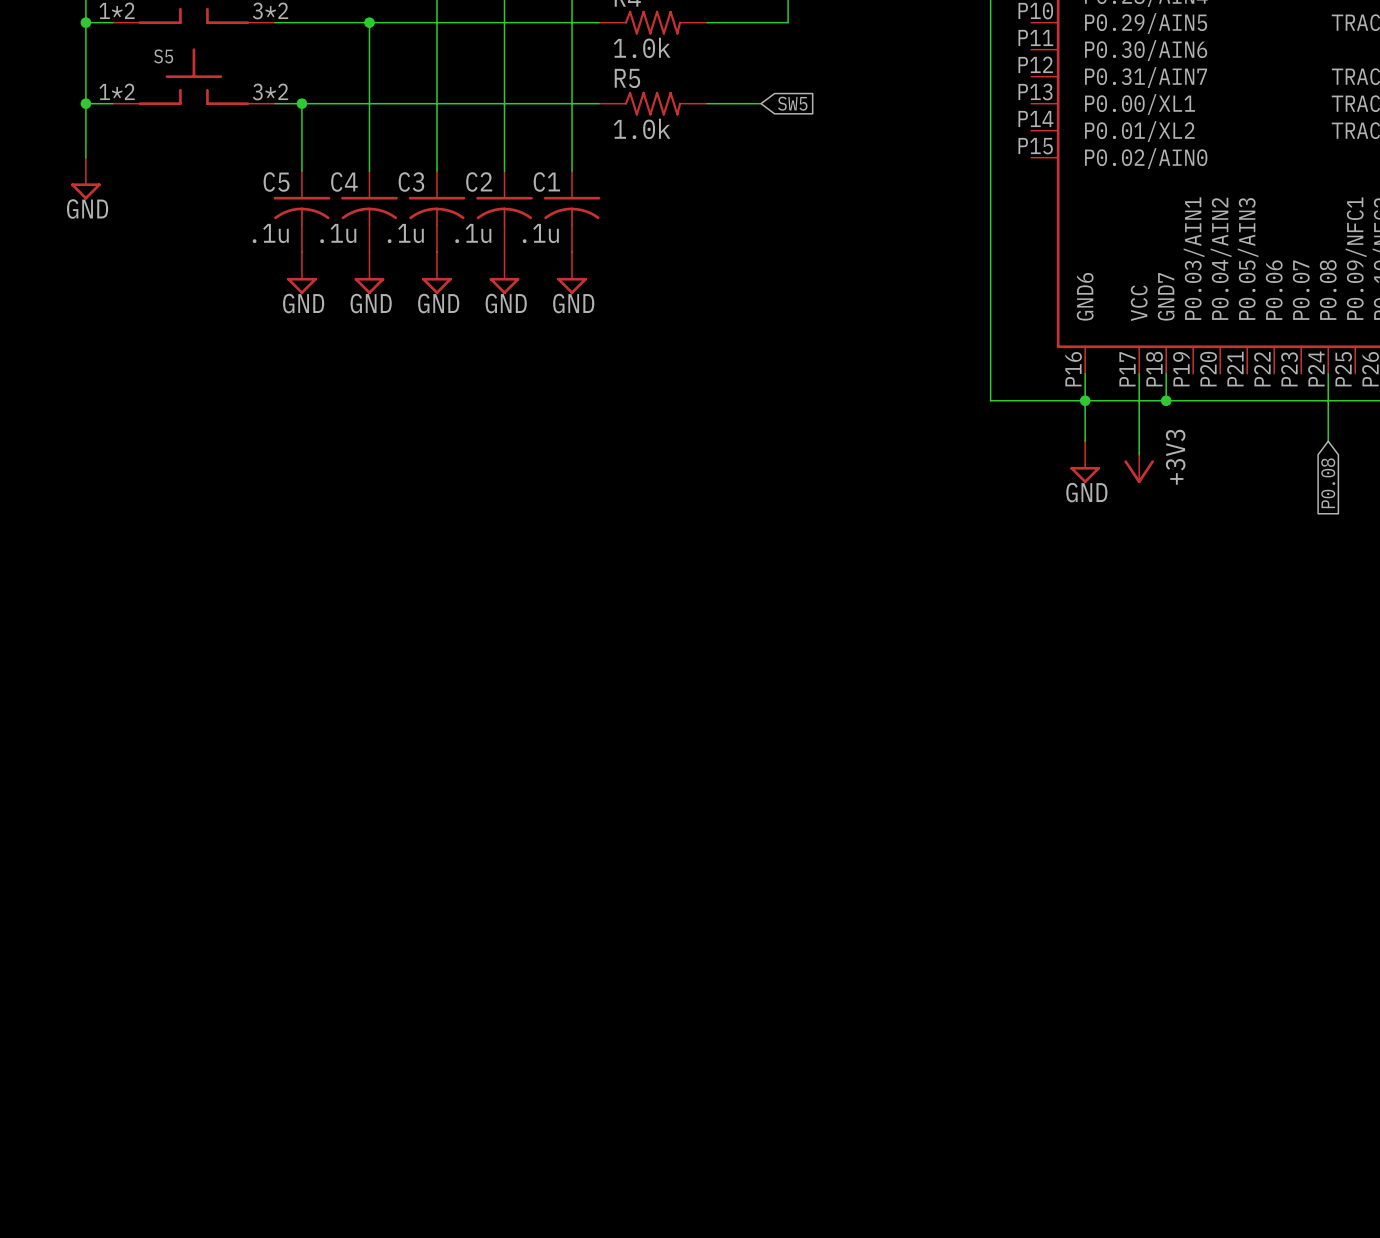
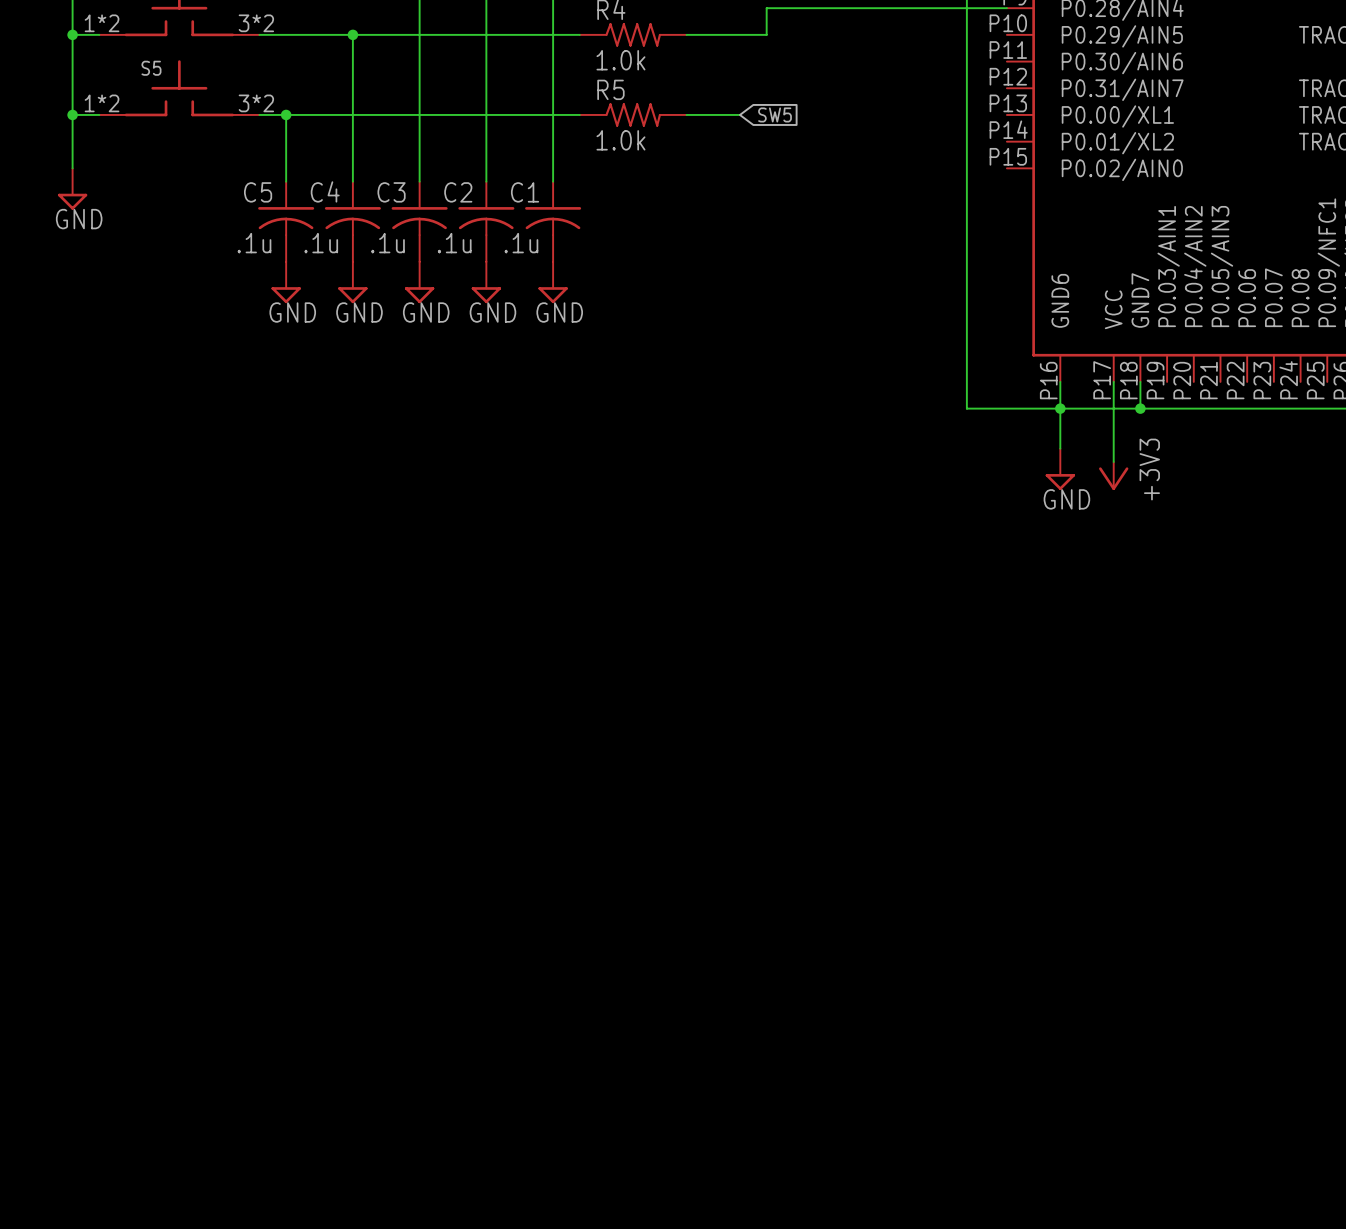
wire: (1328, 373) (1328, 441) -> none
global label: P0.08 (1328, 483) -> none

